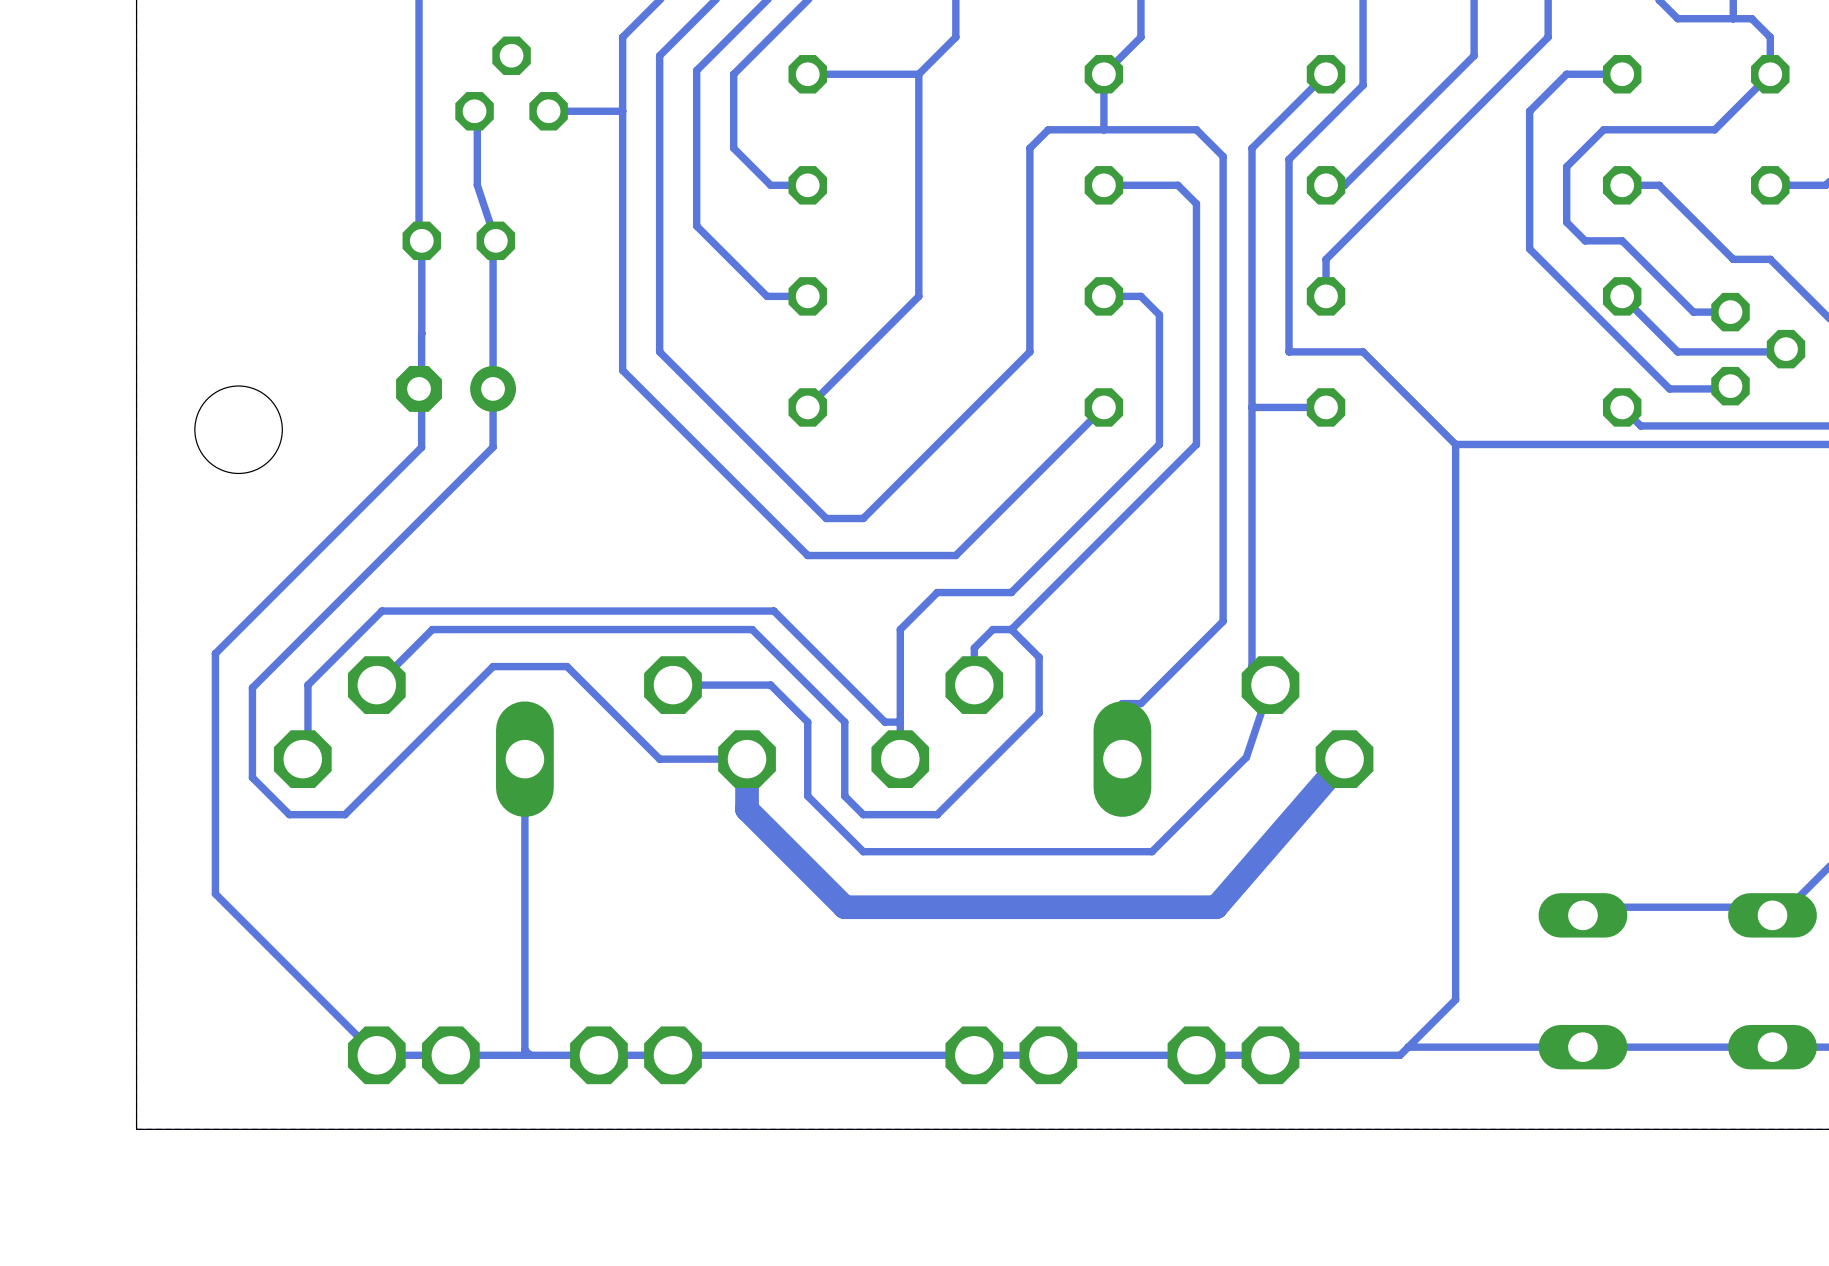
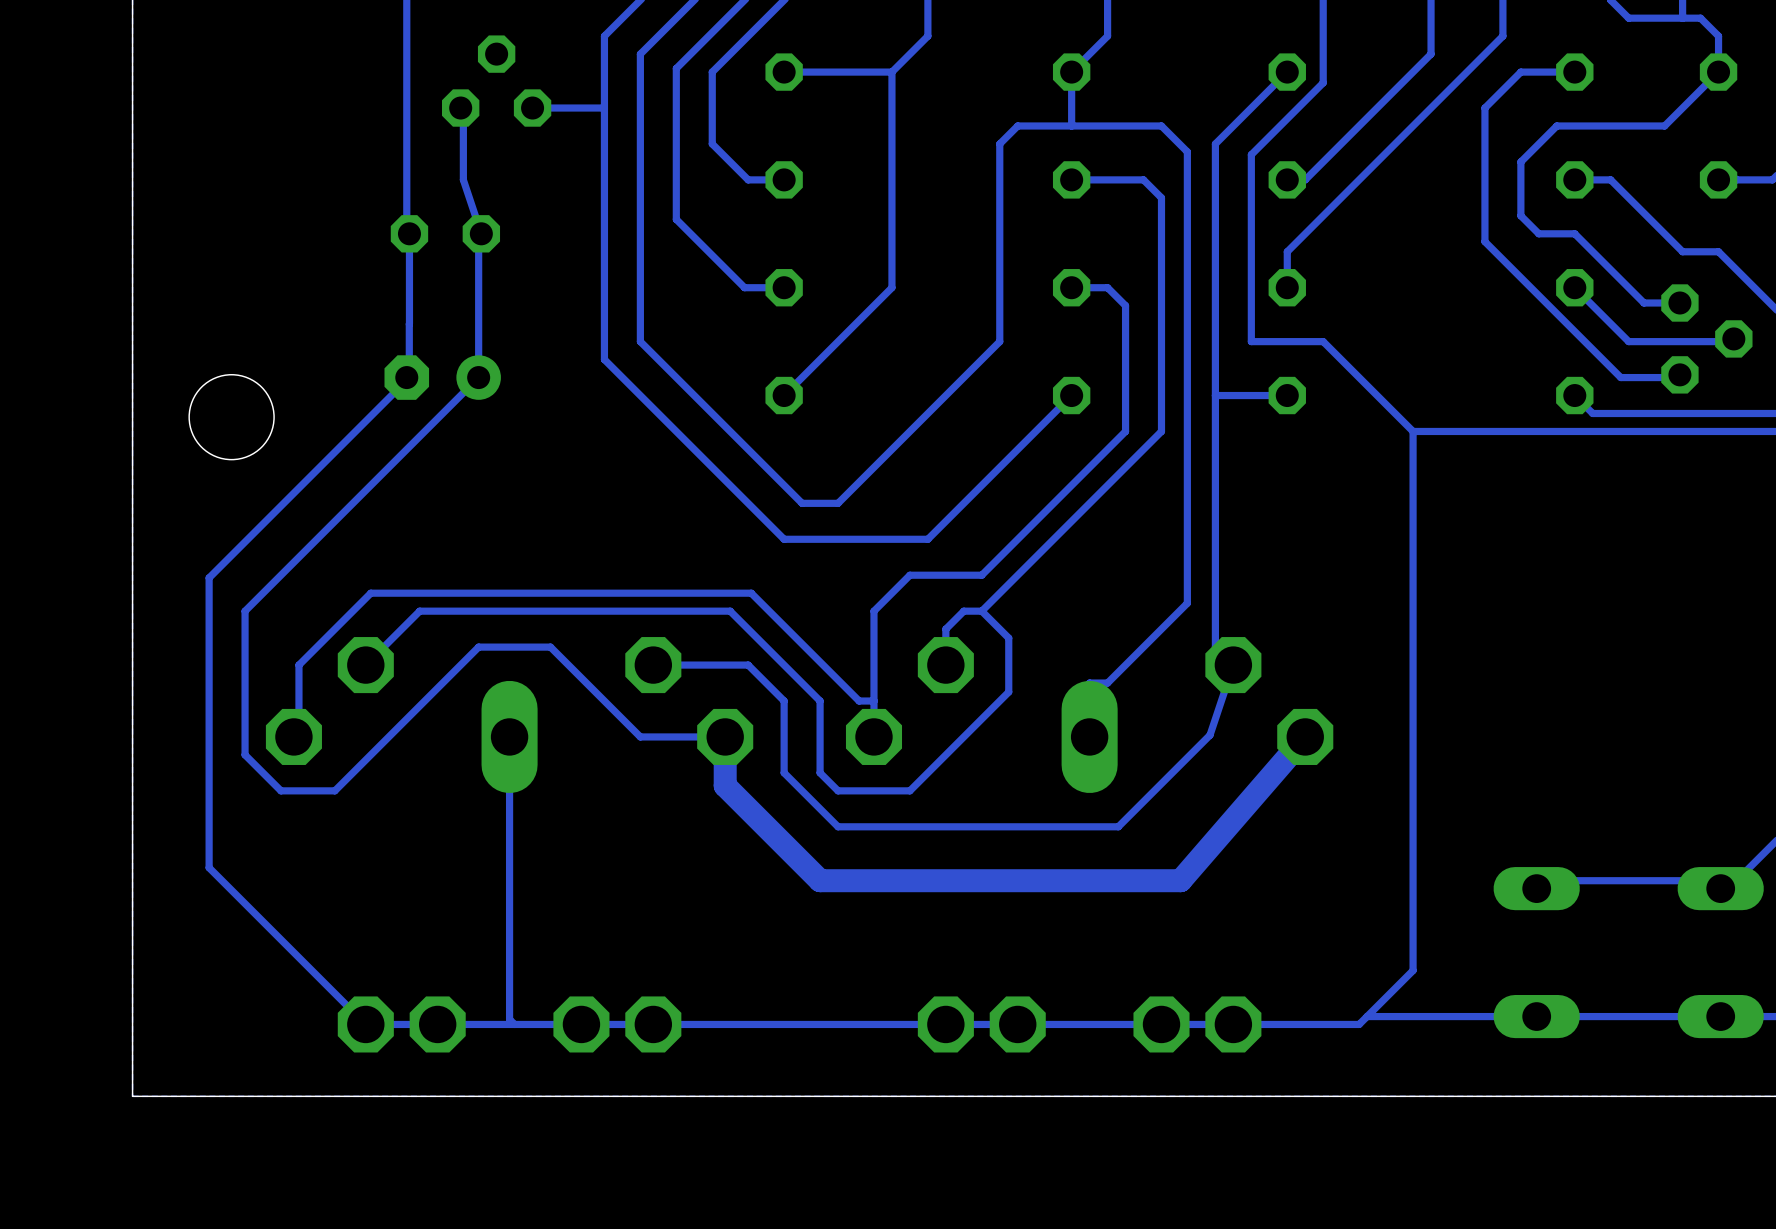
track: (493, 388) (493, 447) (252, 687) -> (478, 377) (245, 611) (245, 667)
track: (421, 389) (421, 447) (215, 653) -> (409, 377) (209, 577) (209, 634)

